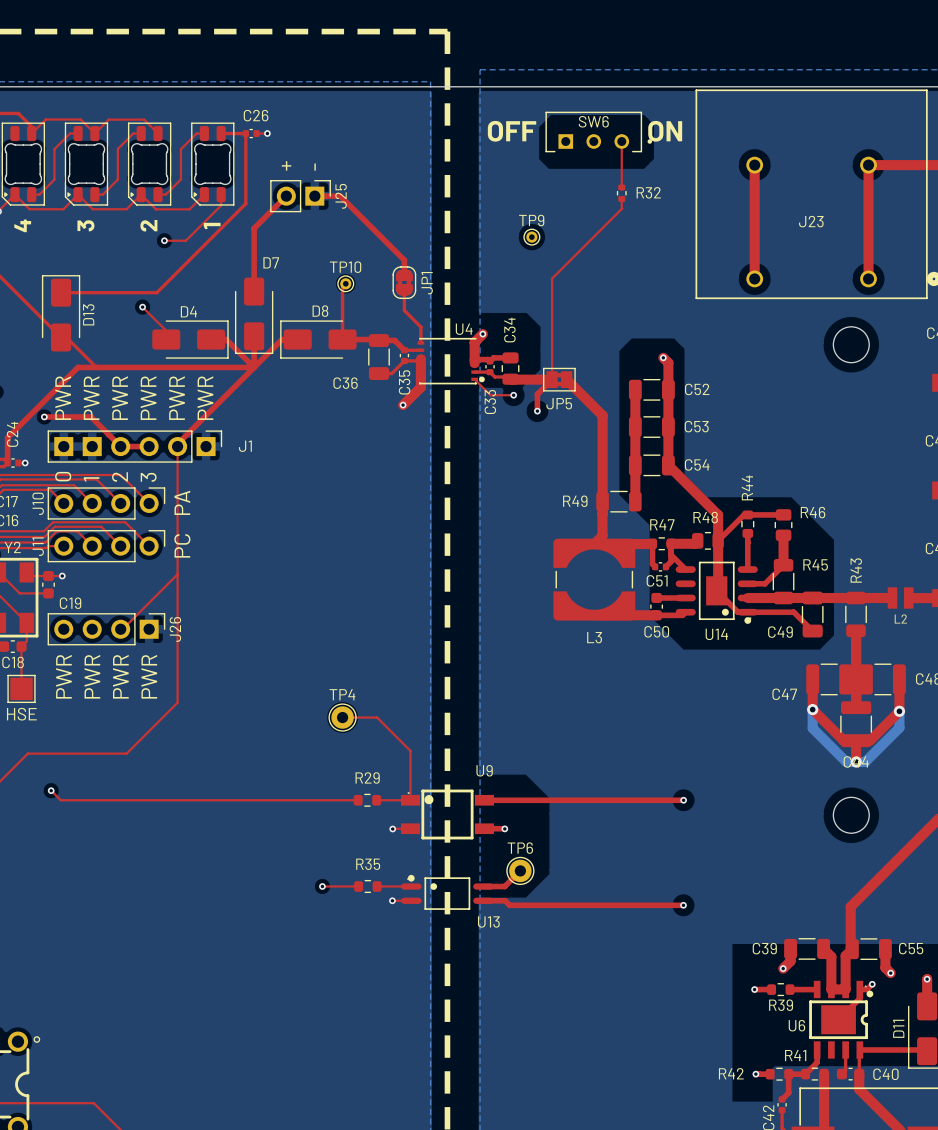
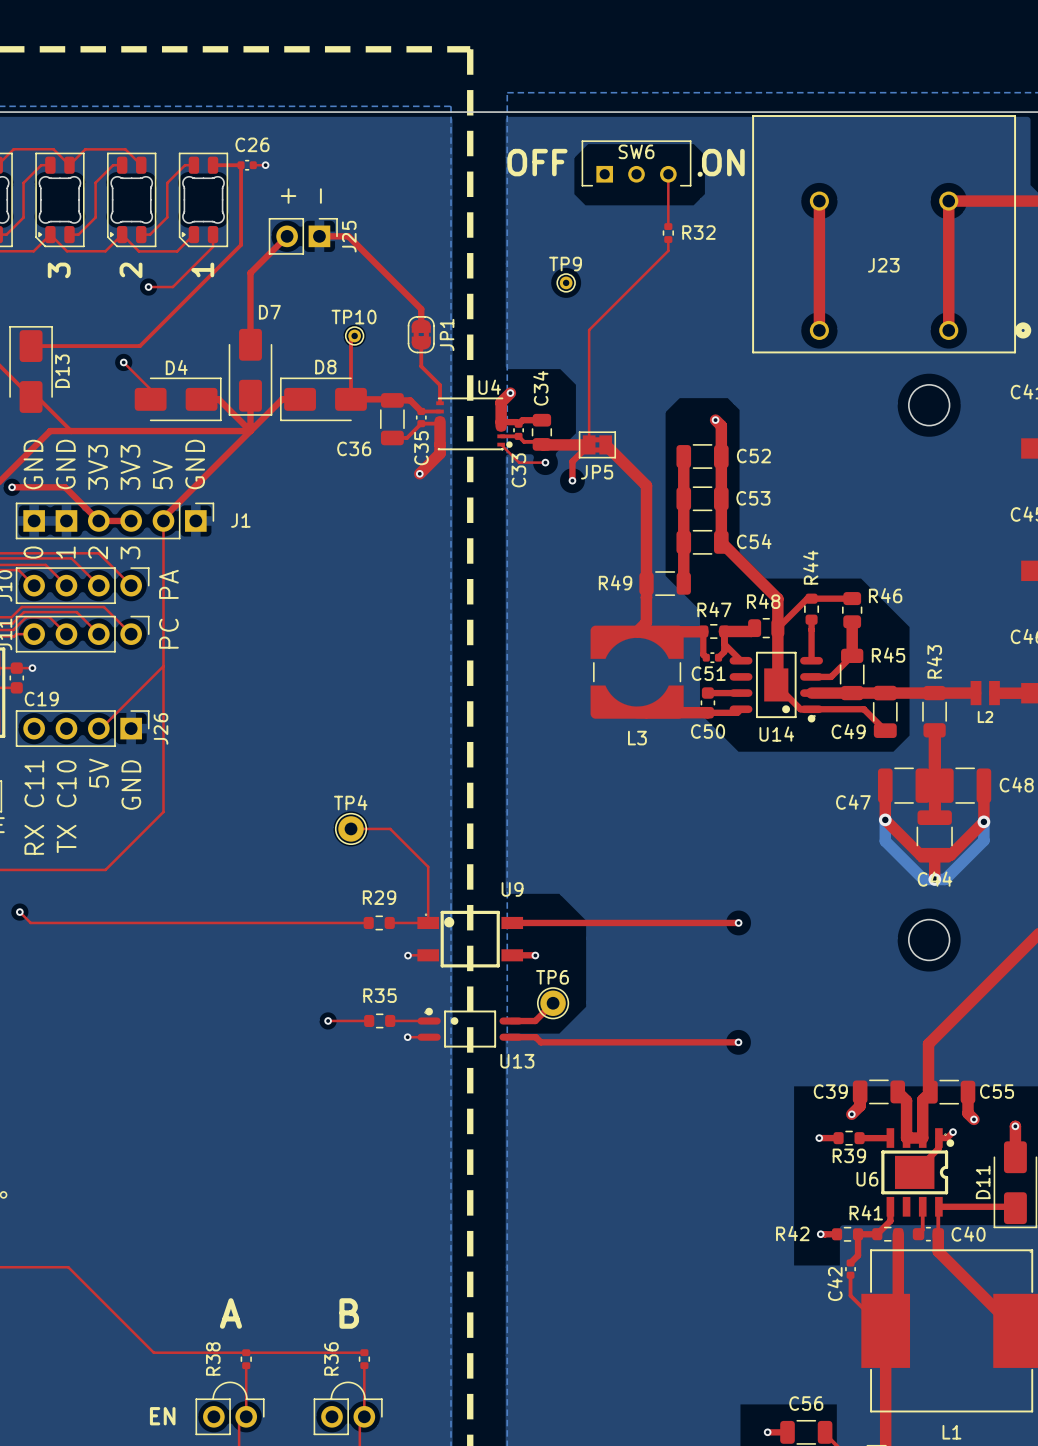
text: PWR (63, 398) -> GND (33, 464)
text: PWR (91, 398) -> GND (65, 464)
text: PWR (120, 398) -> 3V3 (98, 467)
text: PWR (148, 398) -> 3V3 (130, 467)
text: PWR (177, 398) -> 5V (162, 474)
text: PWR (205, 398) -> GND (195, 464)
text: PWR (63, 676) -> RX C11 (34, 807)
text: PWR (92, 676) -> TX C10 (66, 806)
text: PWR (120, 676) -> 5V (99, 773)
text: PWR (149, 676) -> GND (131, 785)

